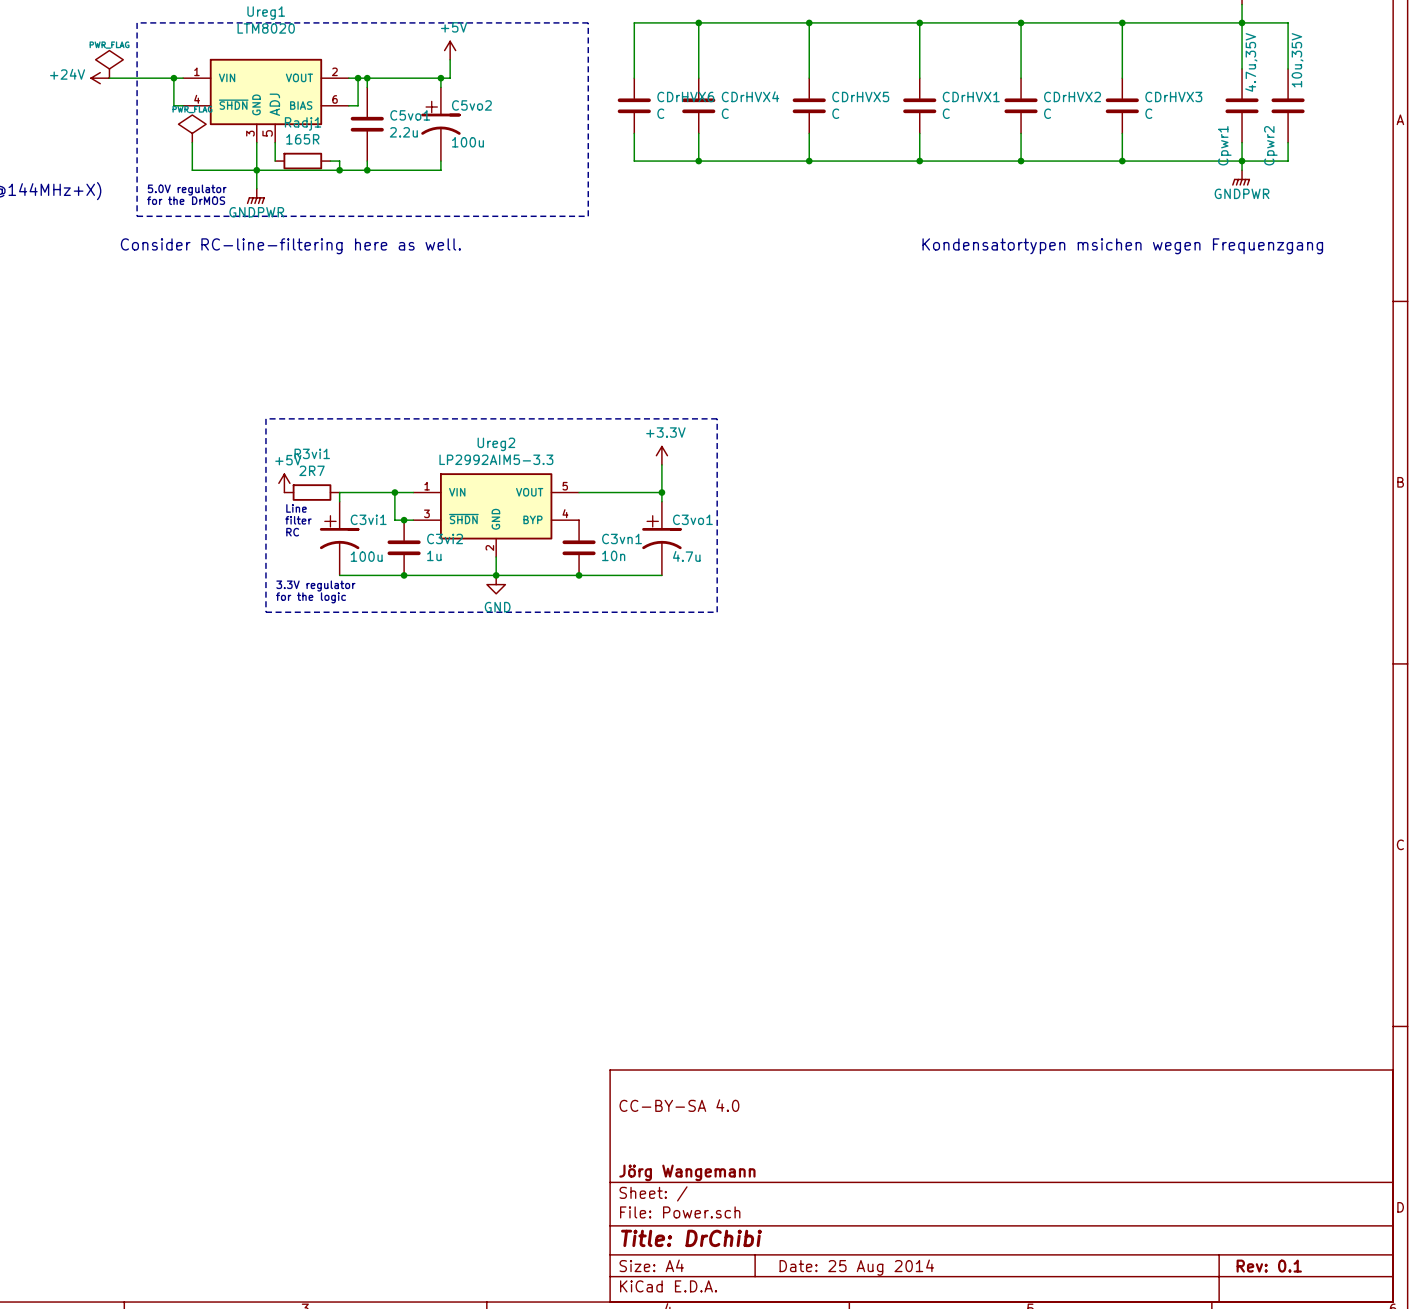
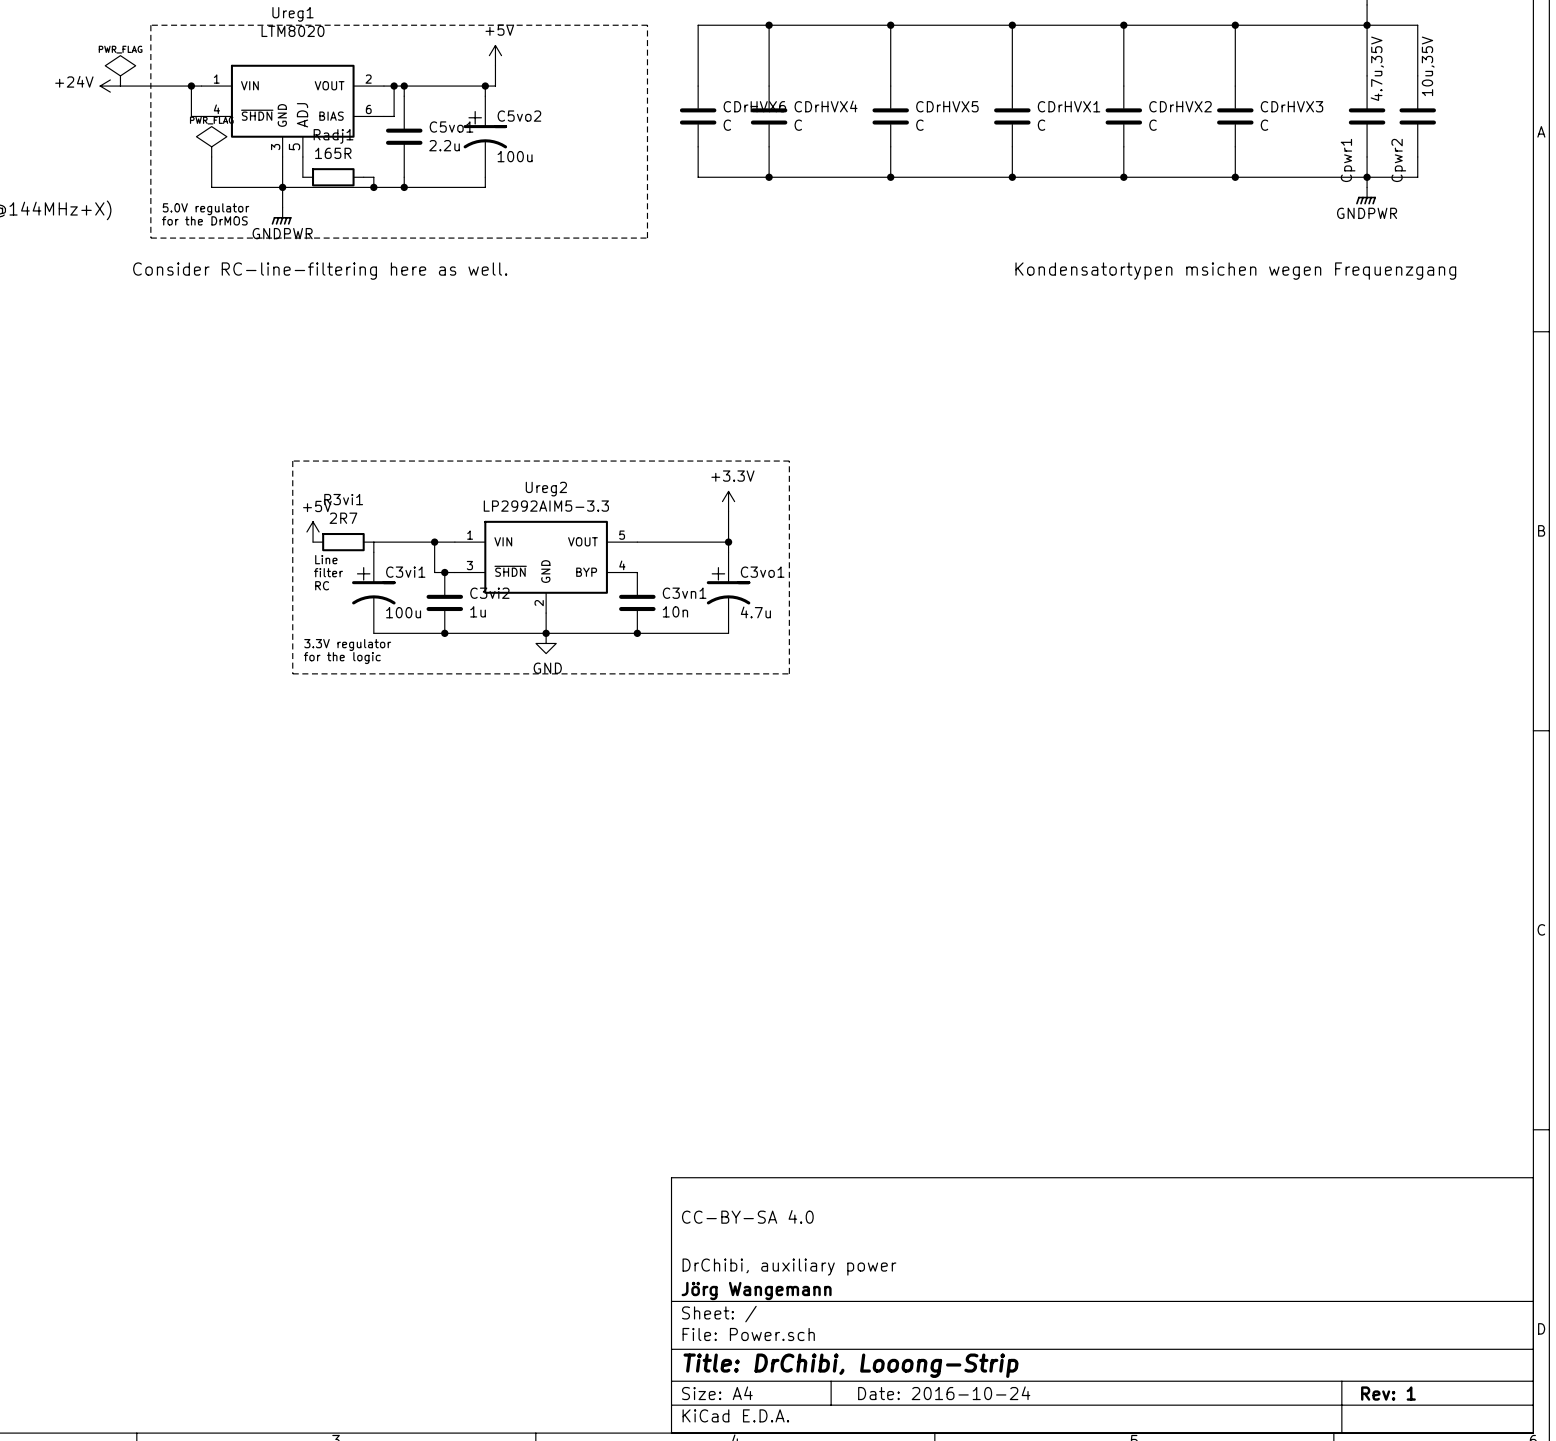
title block: none -> DrChibi, auxiliary power (789, 1267)
title block: Title: DrChibi (691, 1238) -> Title: DrChibi, Looong-Strip (851, 1365)
title block: Rev: 0.1 (1269, 1266) -> Rev: 1 (1388, 1393)
title block: Date: 25 Aug 2014 (856, 1267) -> Date: 2016-10-24 (944, 1393)

